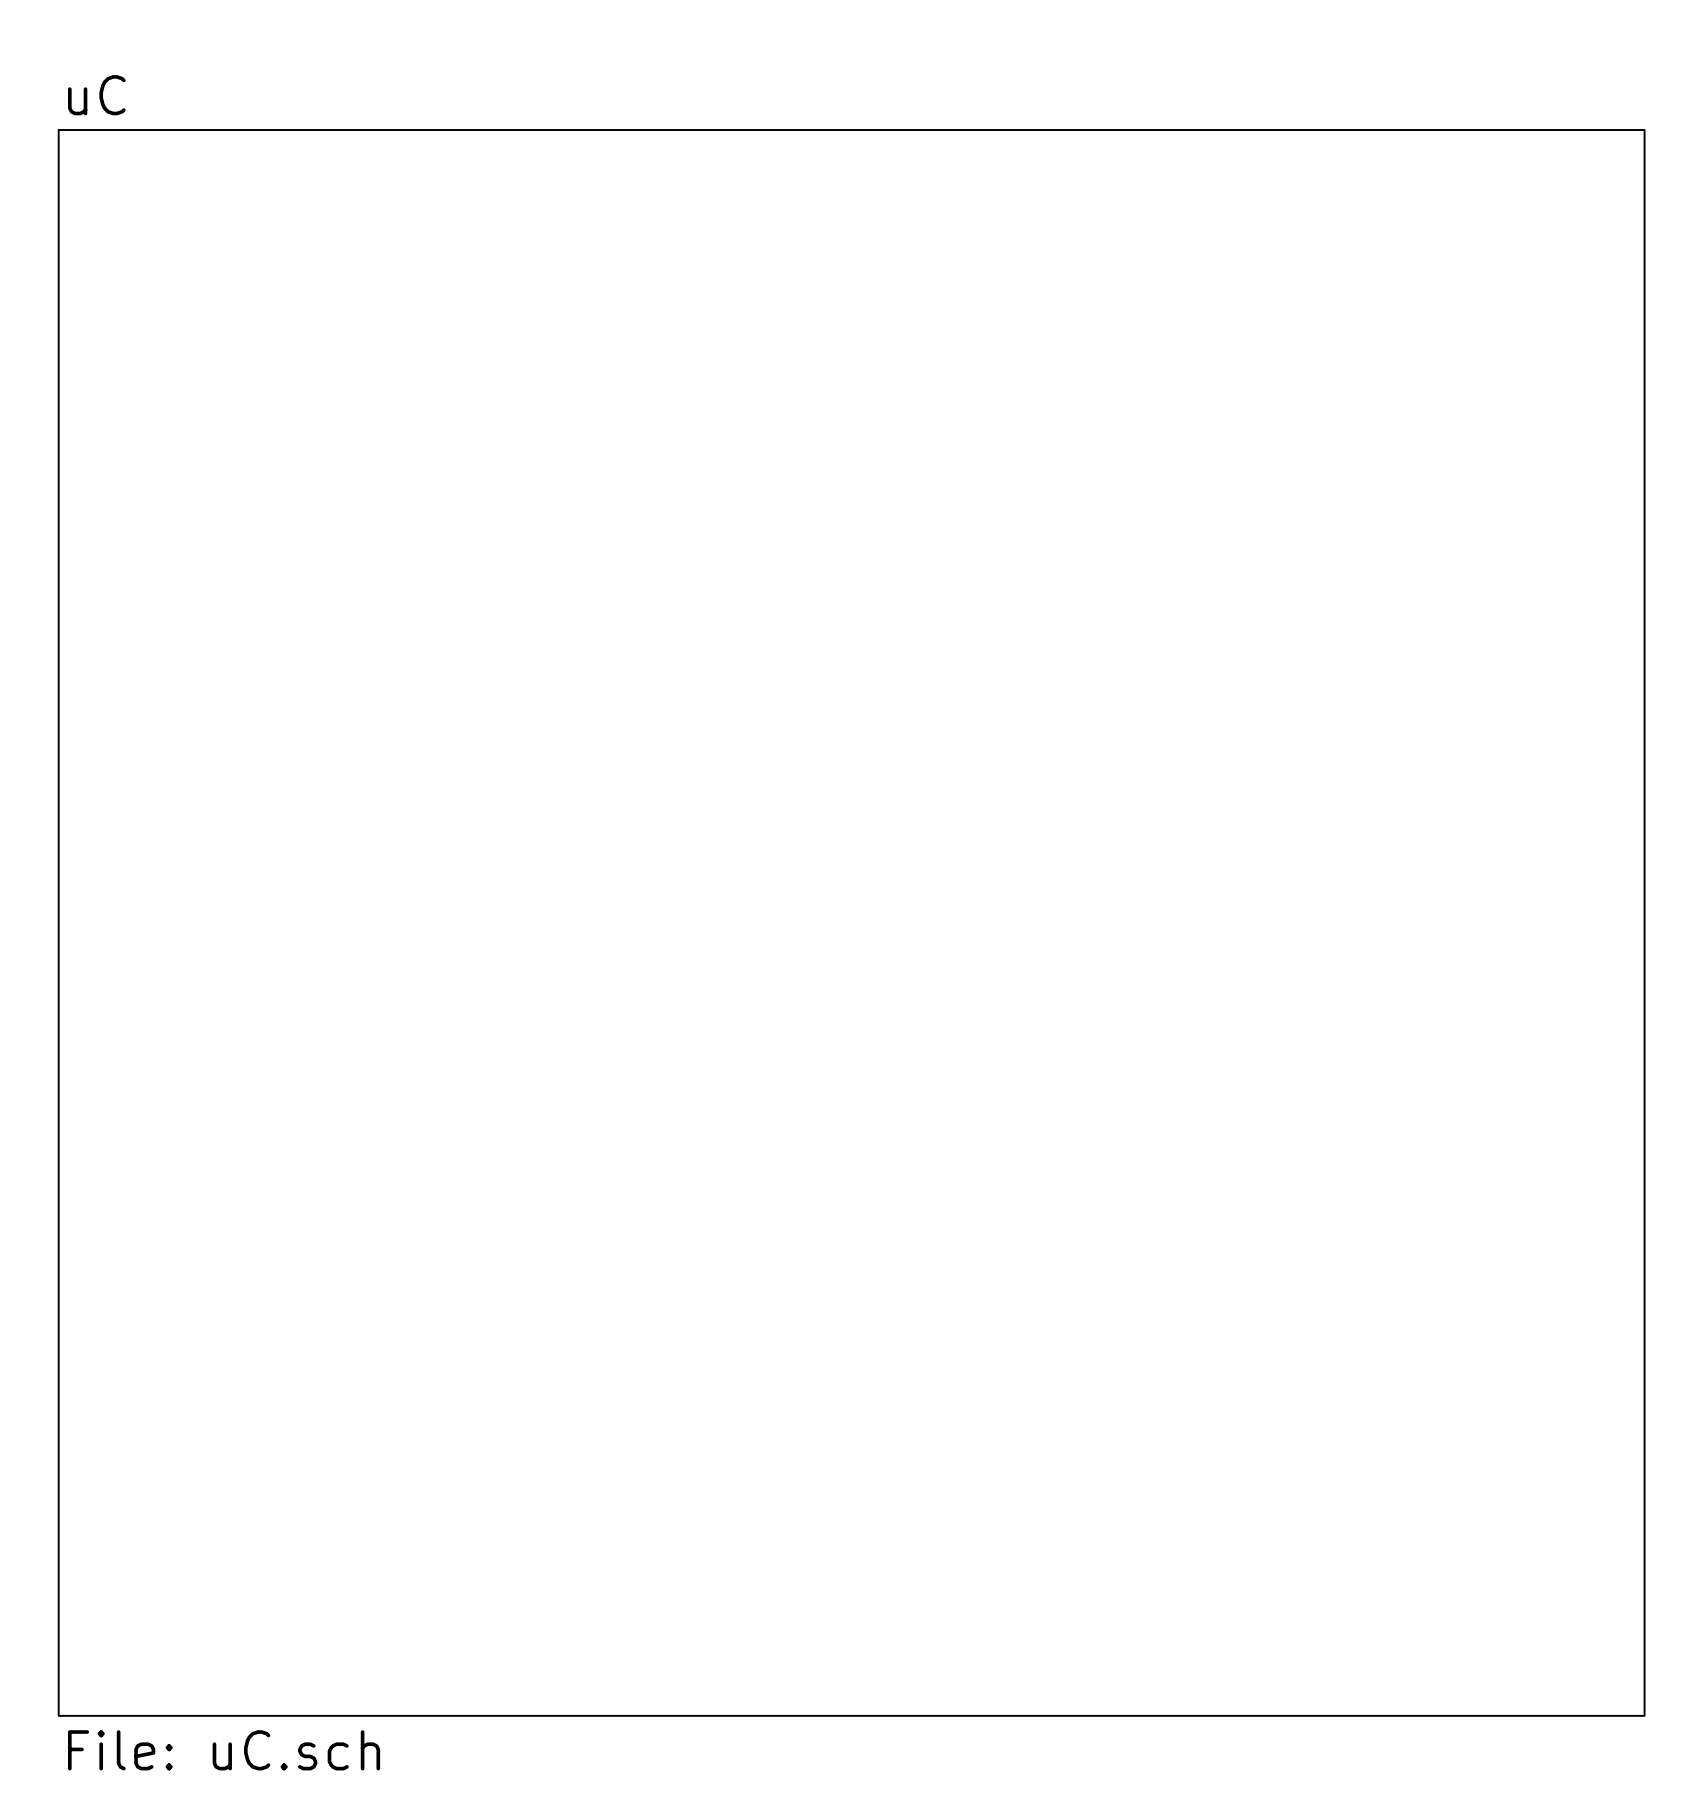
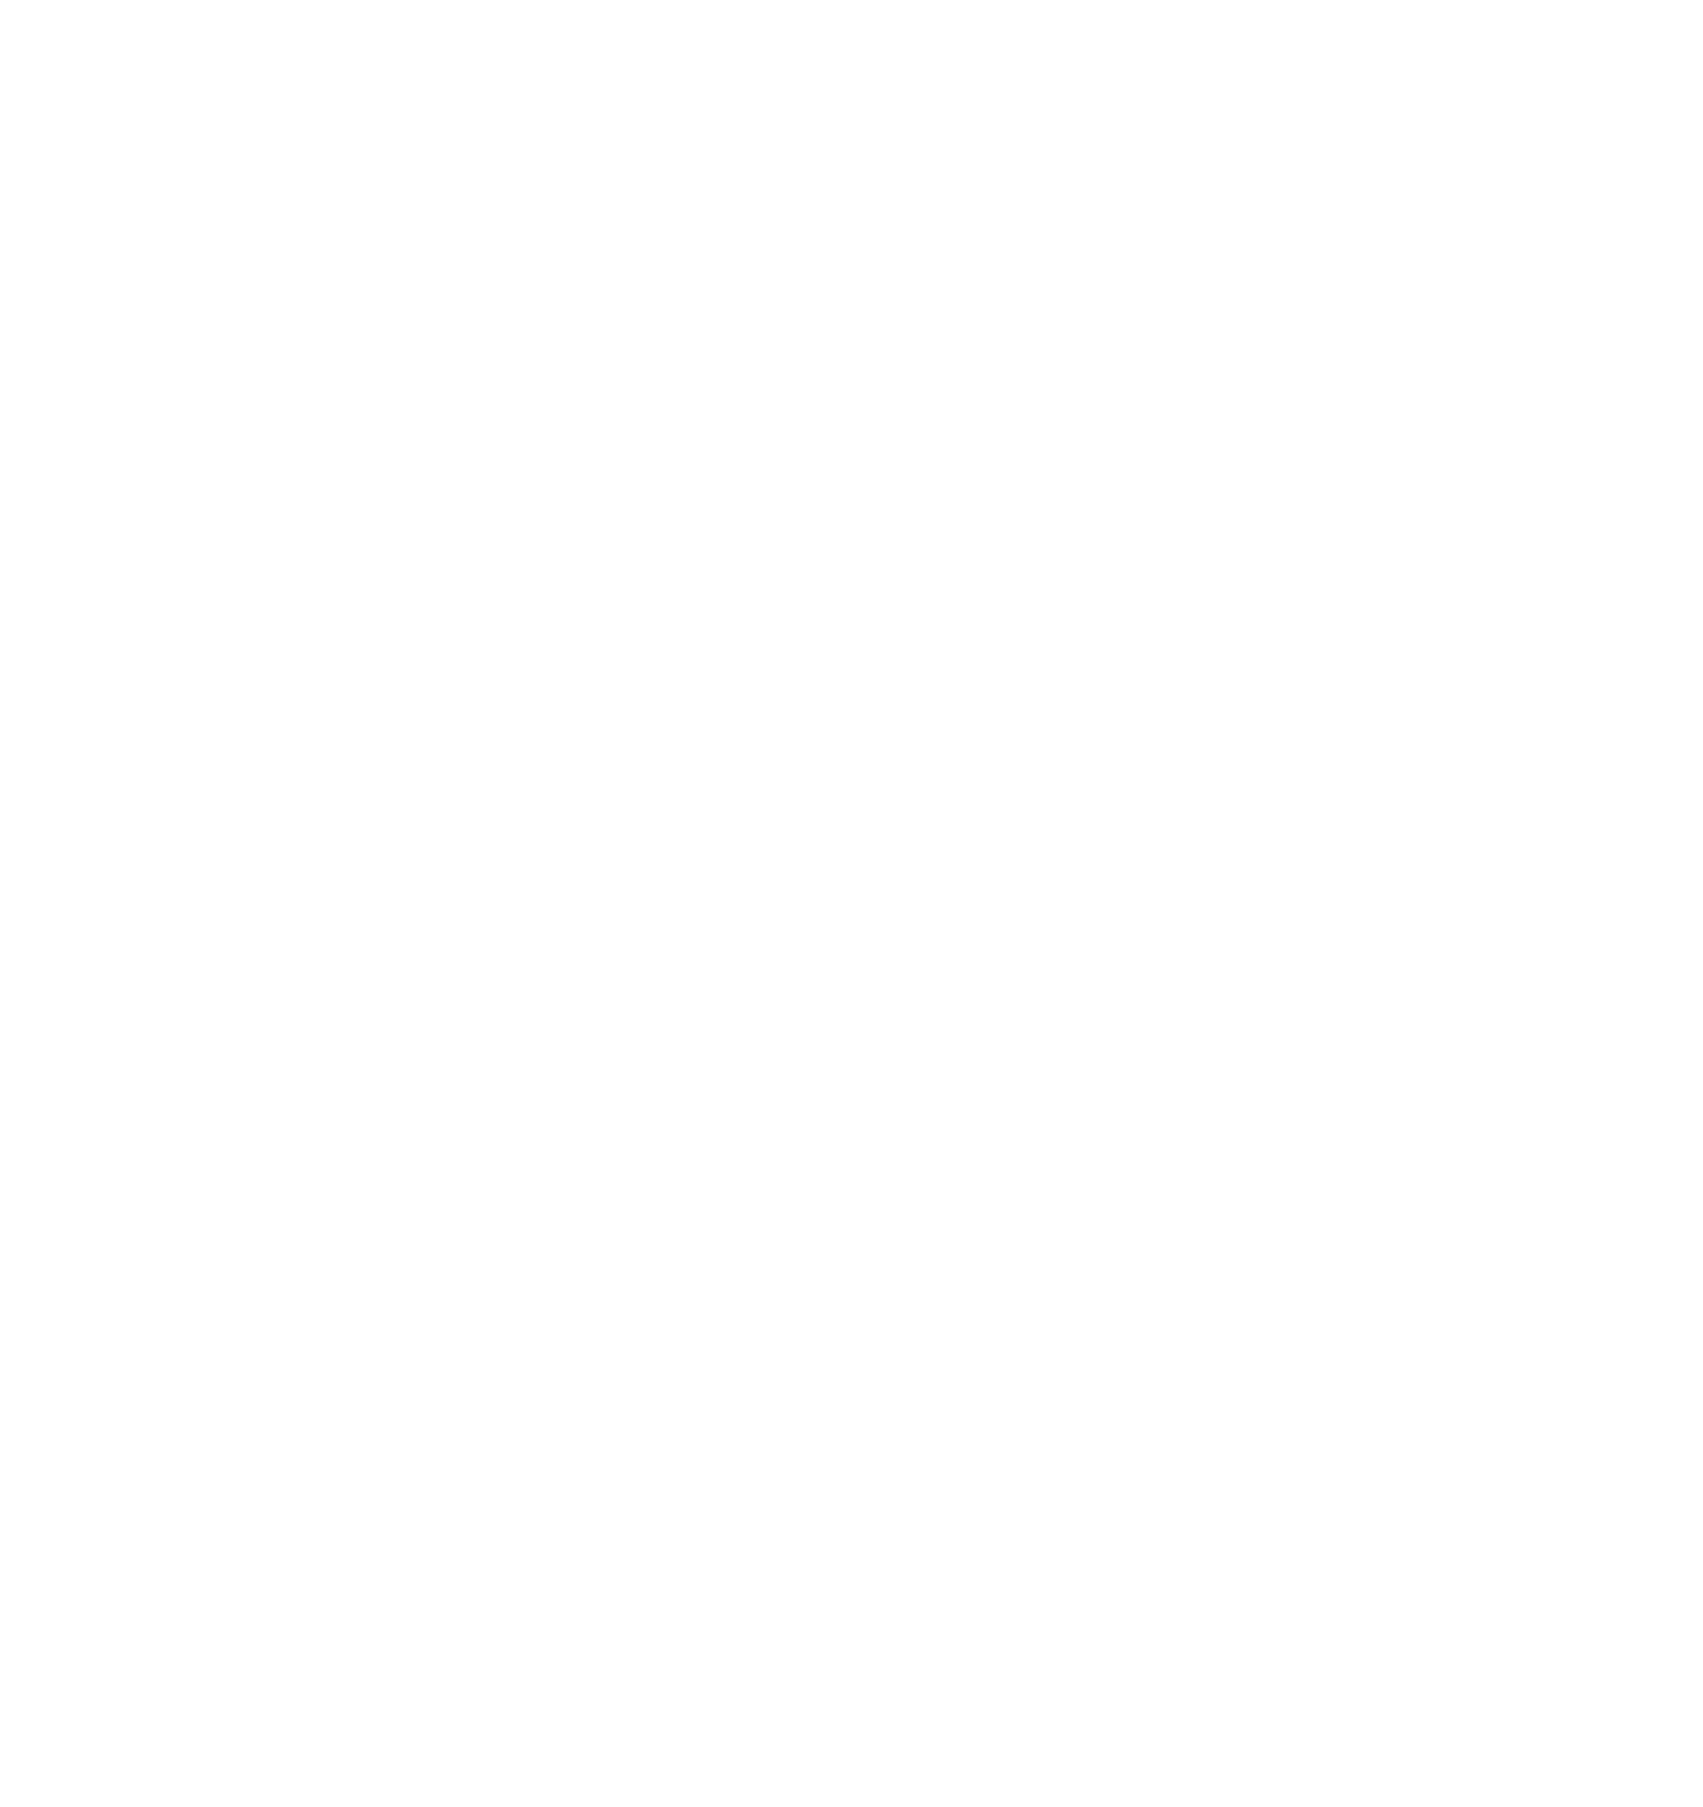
sheet uC: File: uC.sch (851, 922) -> none

